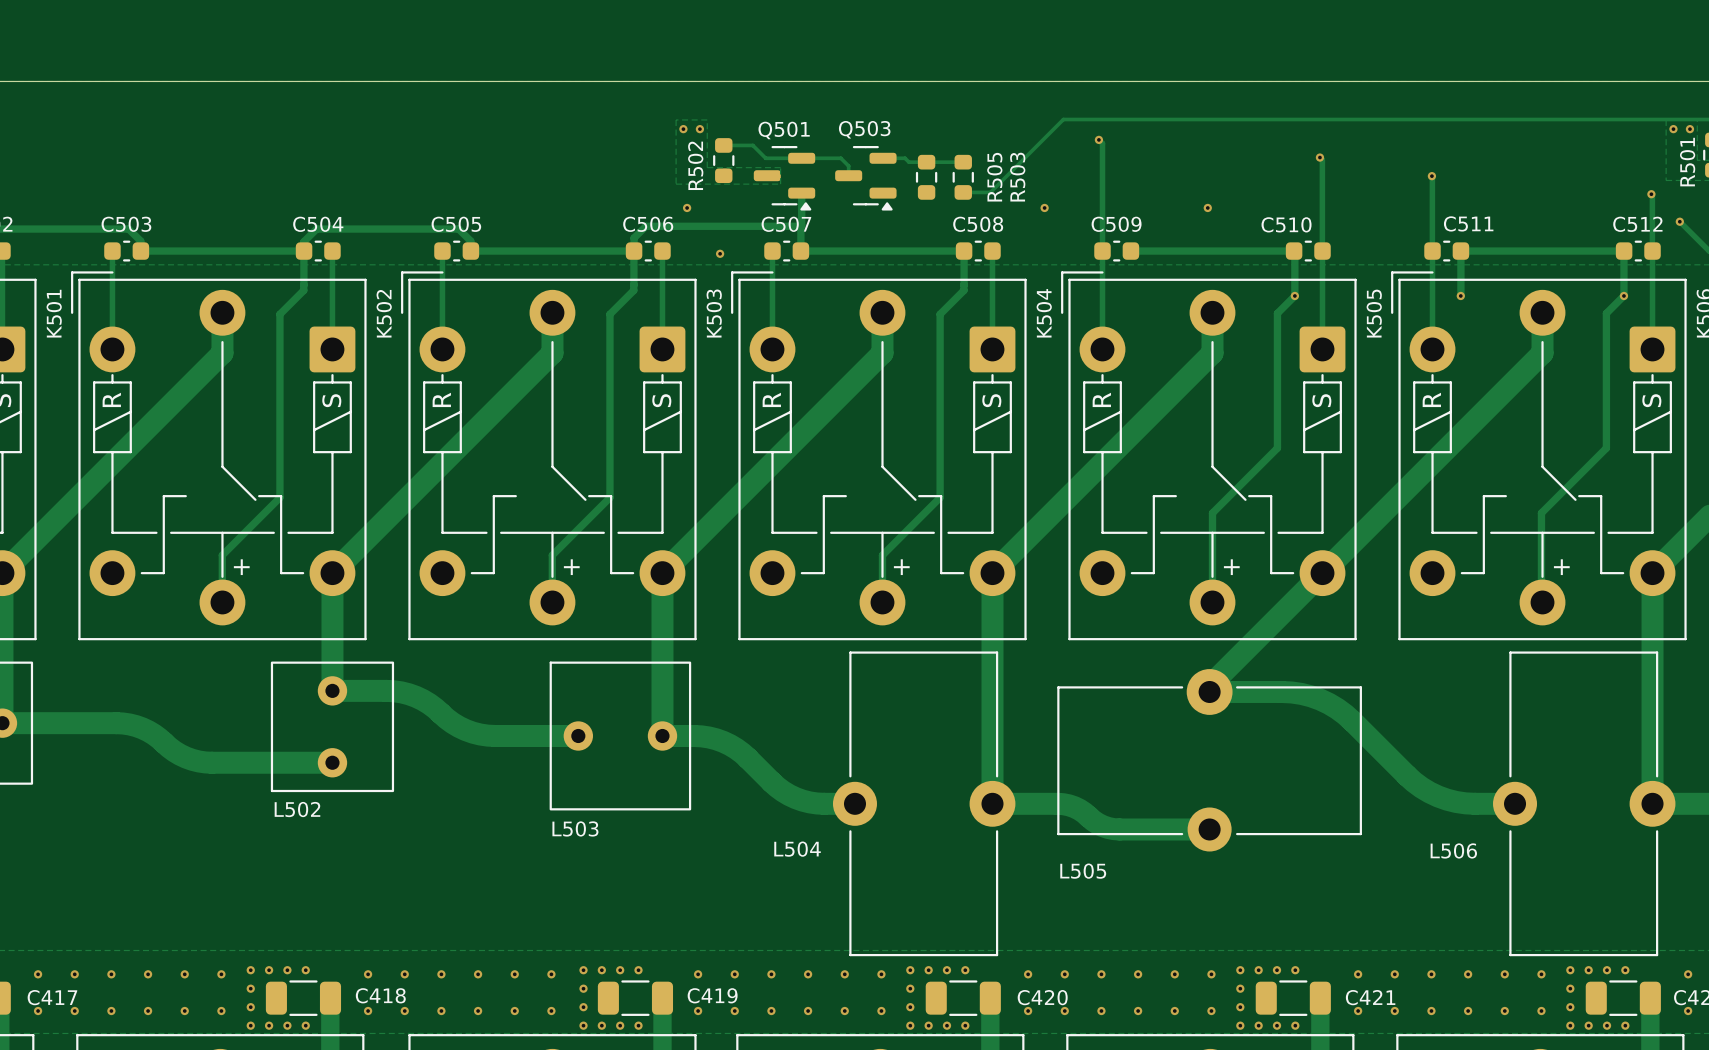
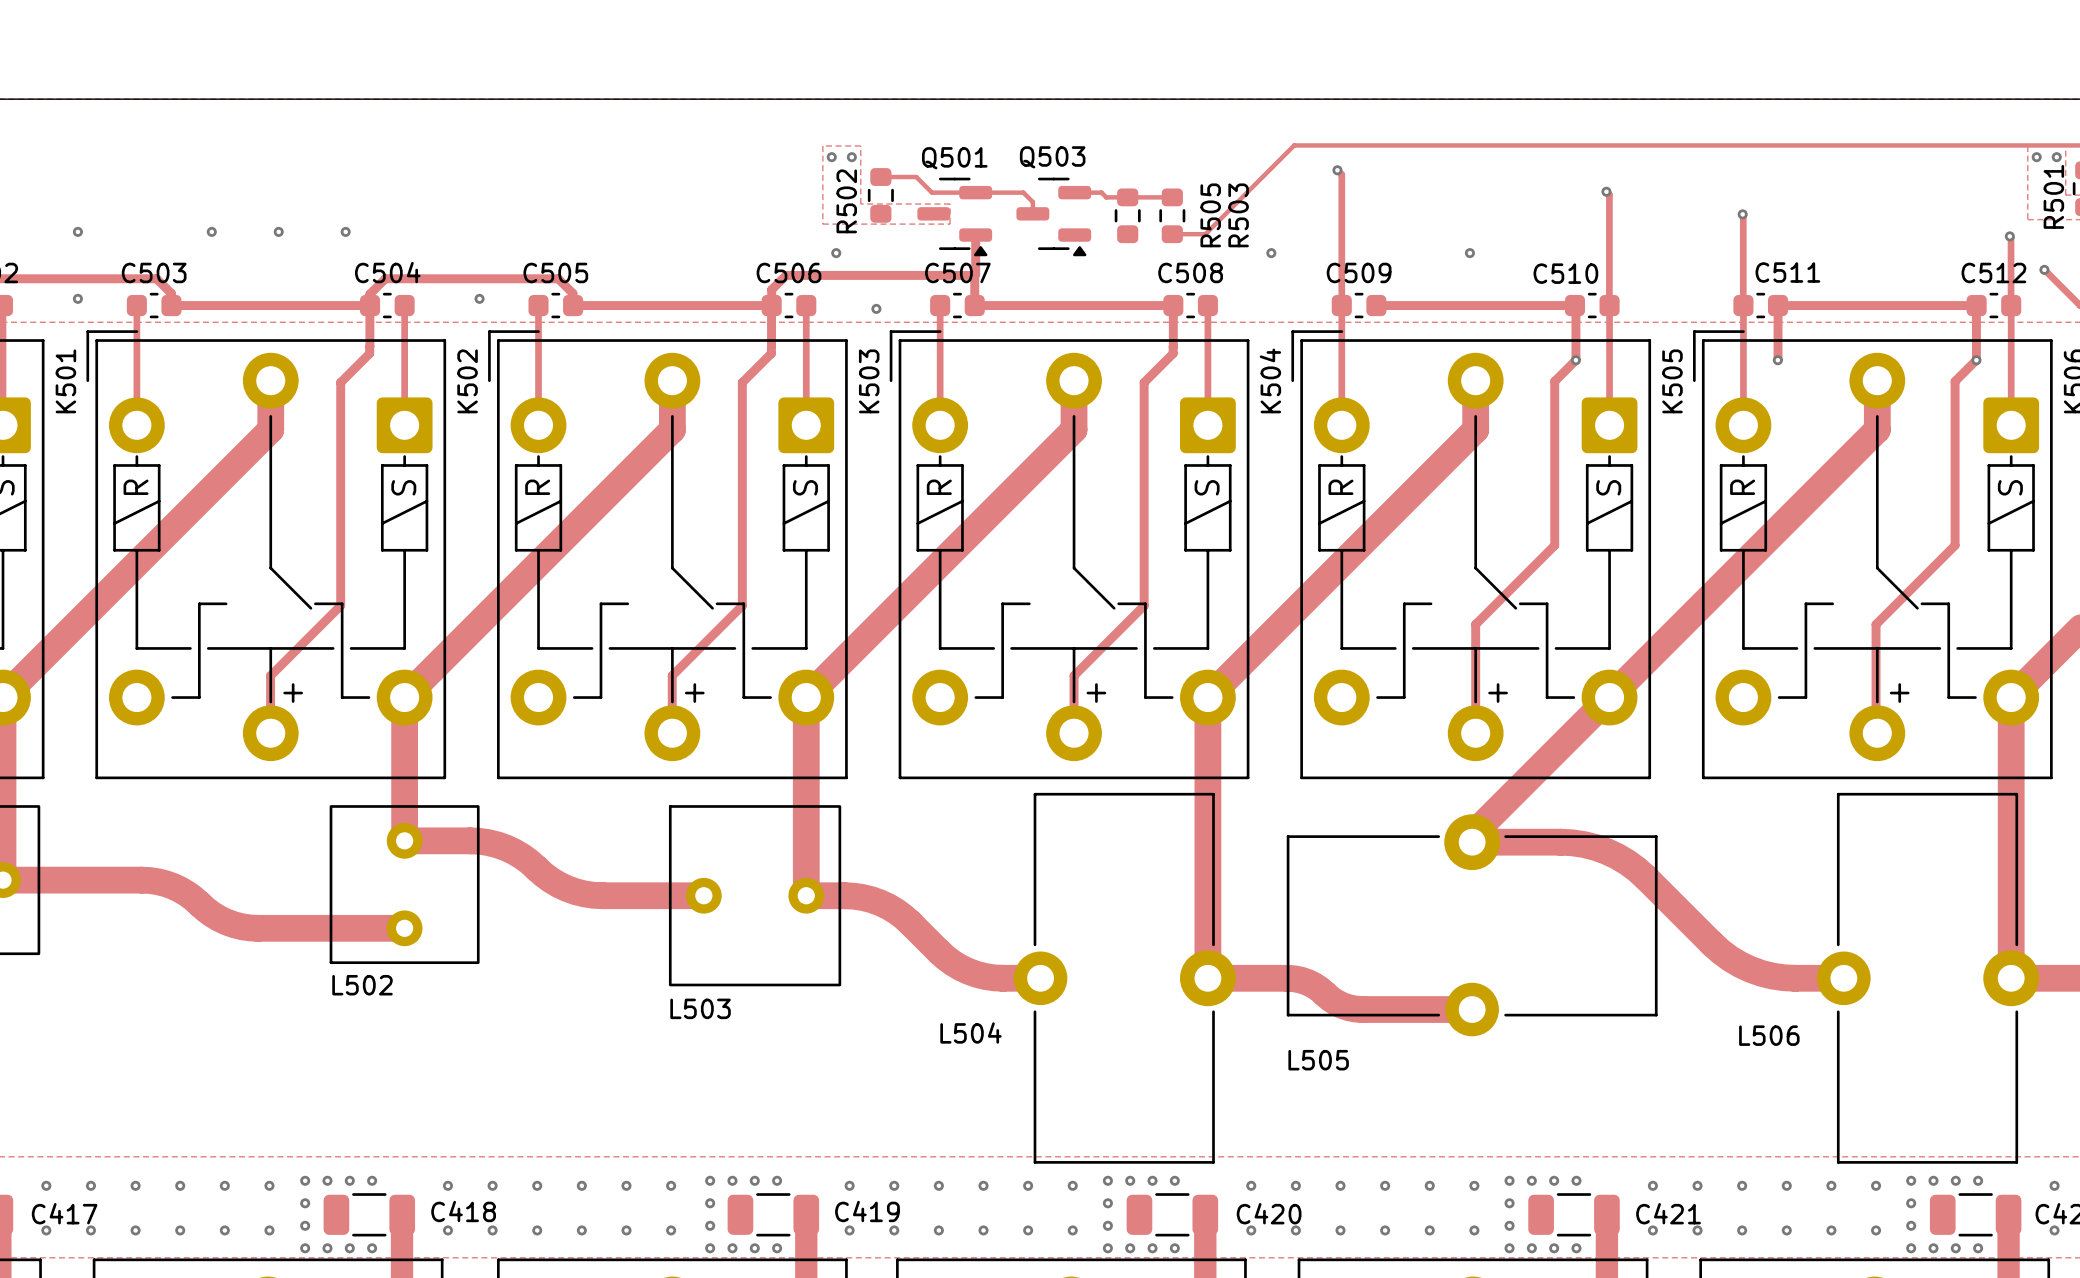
via: none -> (77, 231)
via: none -> (211, 231)
via: none -> (278, 231)
via: none -> (345, 231)
via: none -> (77, 298)
via: none -> (479, 298)

